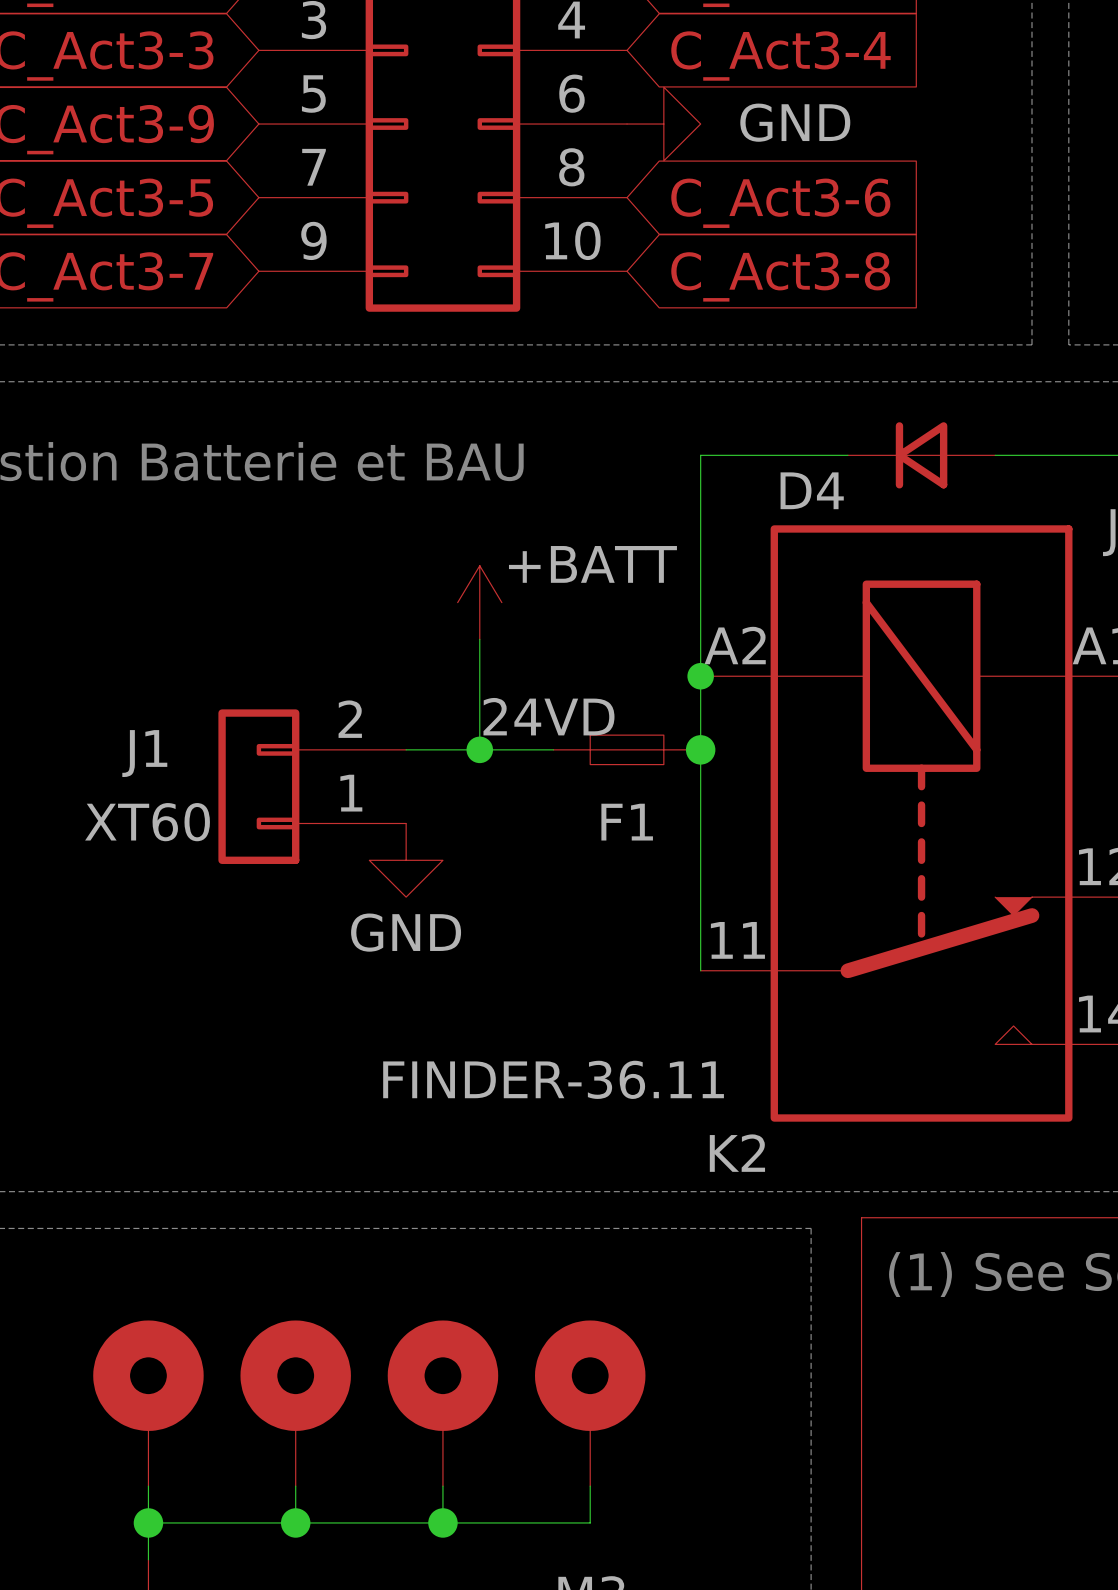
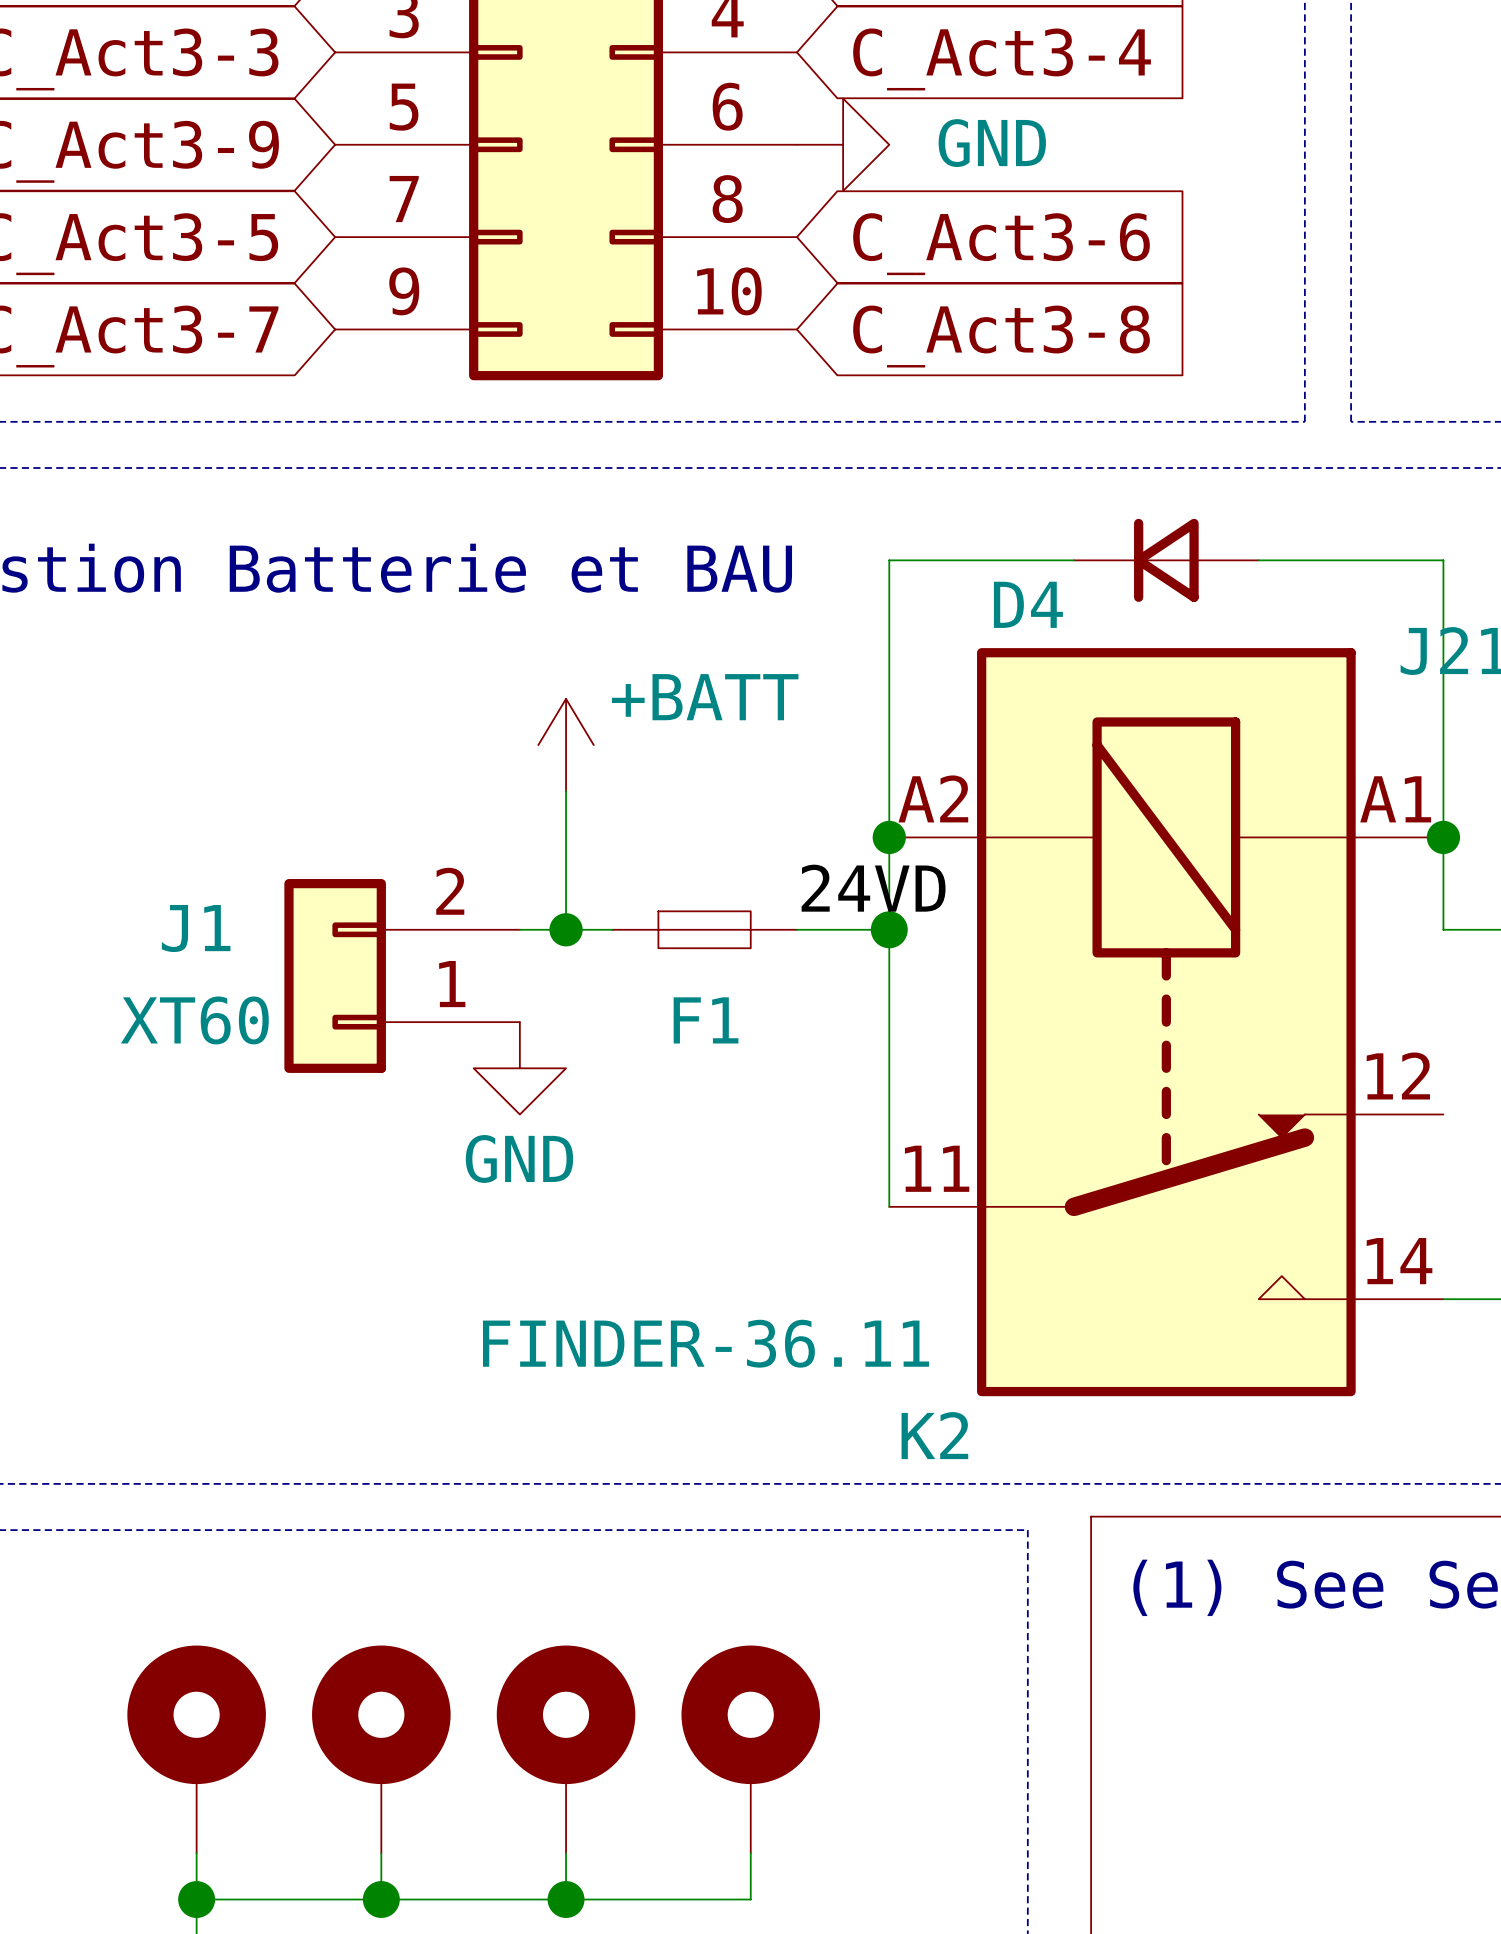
power symbol position: +BATT (479, 602) -> +BATT (566, 745)
wire: none -> (566, 791) (566, 929)
wire: (479, 639) (479, 749) (553, 749) -> none
label position: 24VD (548, 716) -> 24VD (873, 888)
junction position: (479, 749) -> (566, 929)
F1 position: (627, 749) -> (704, 929)

